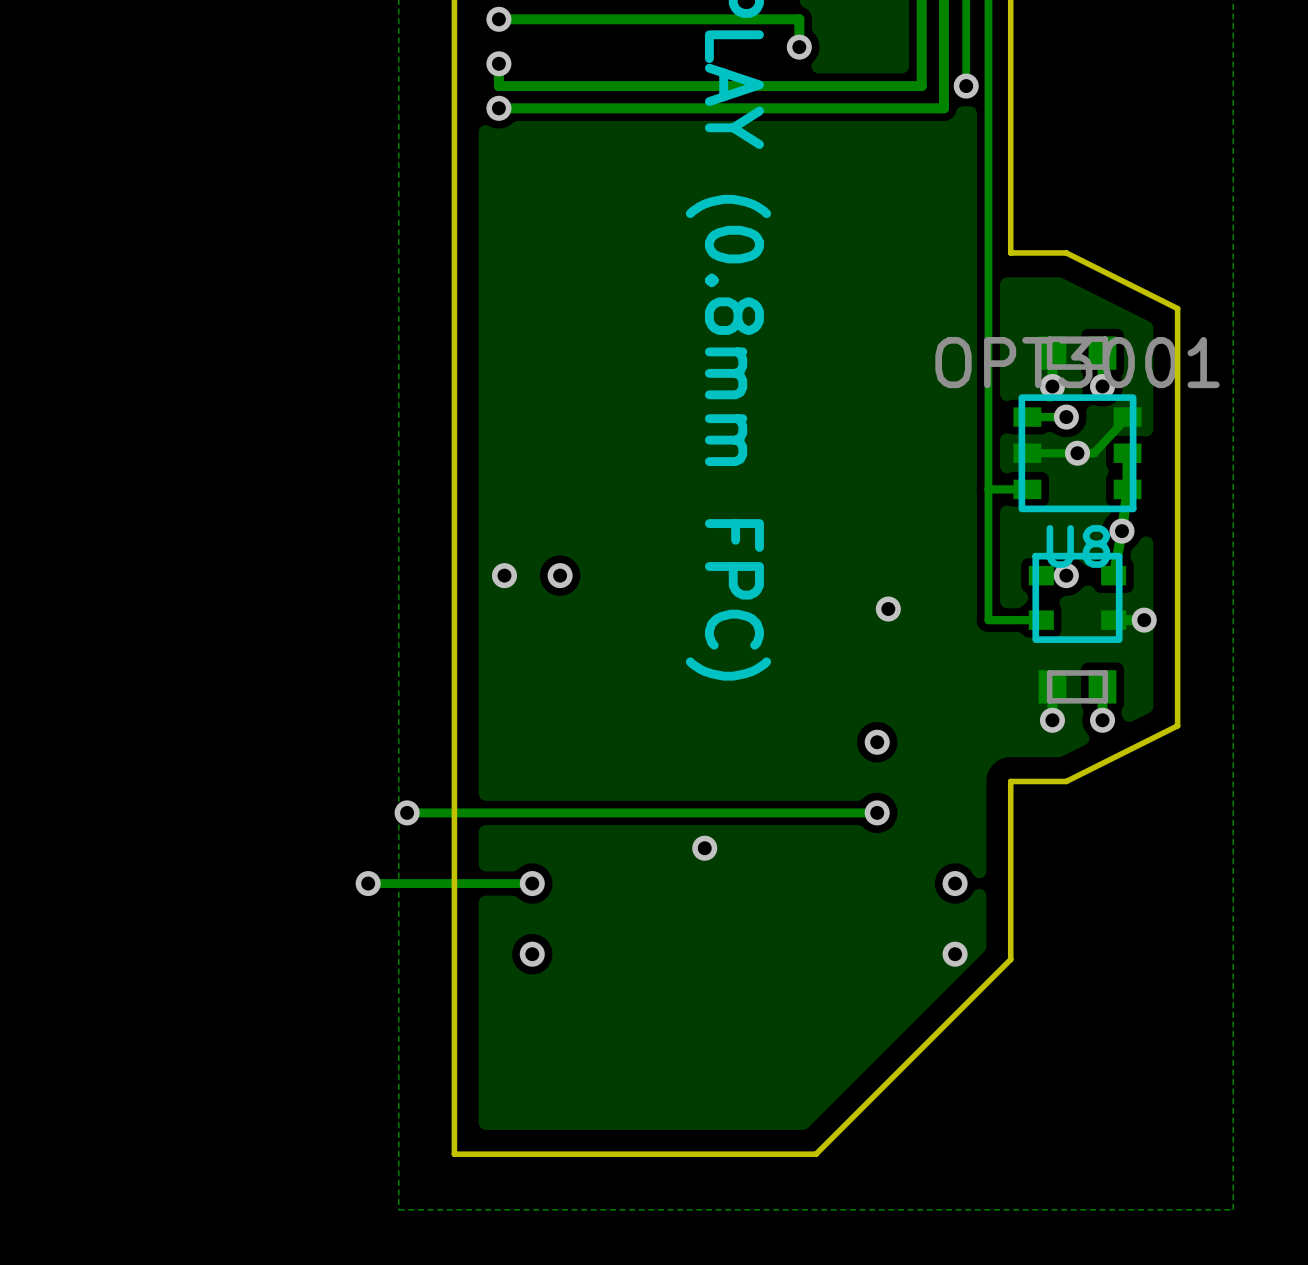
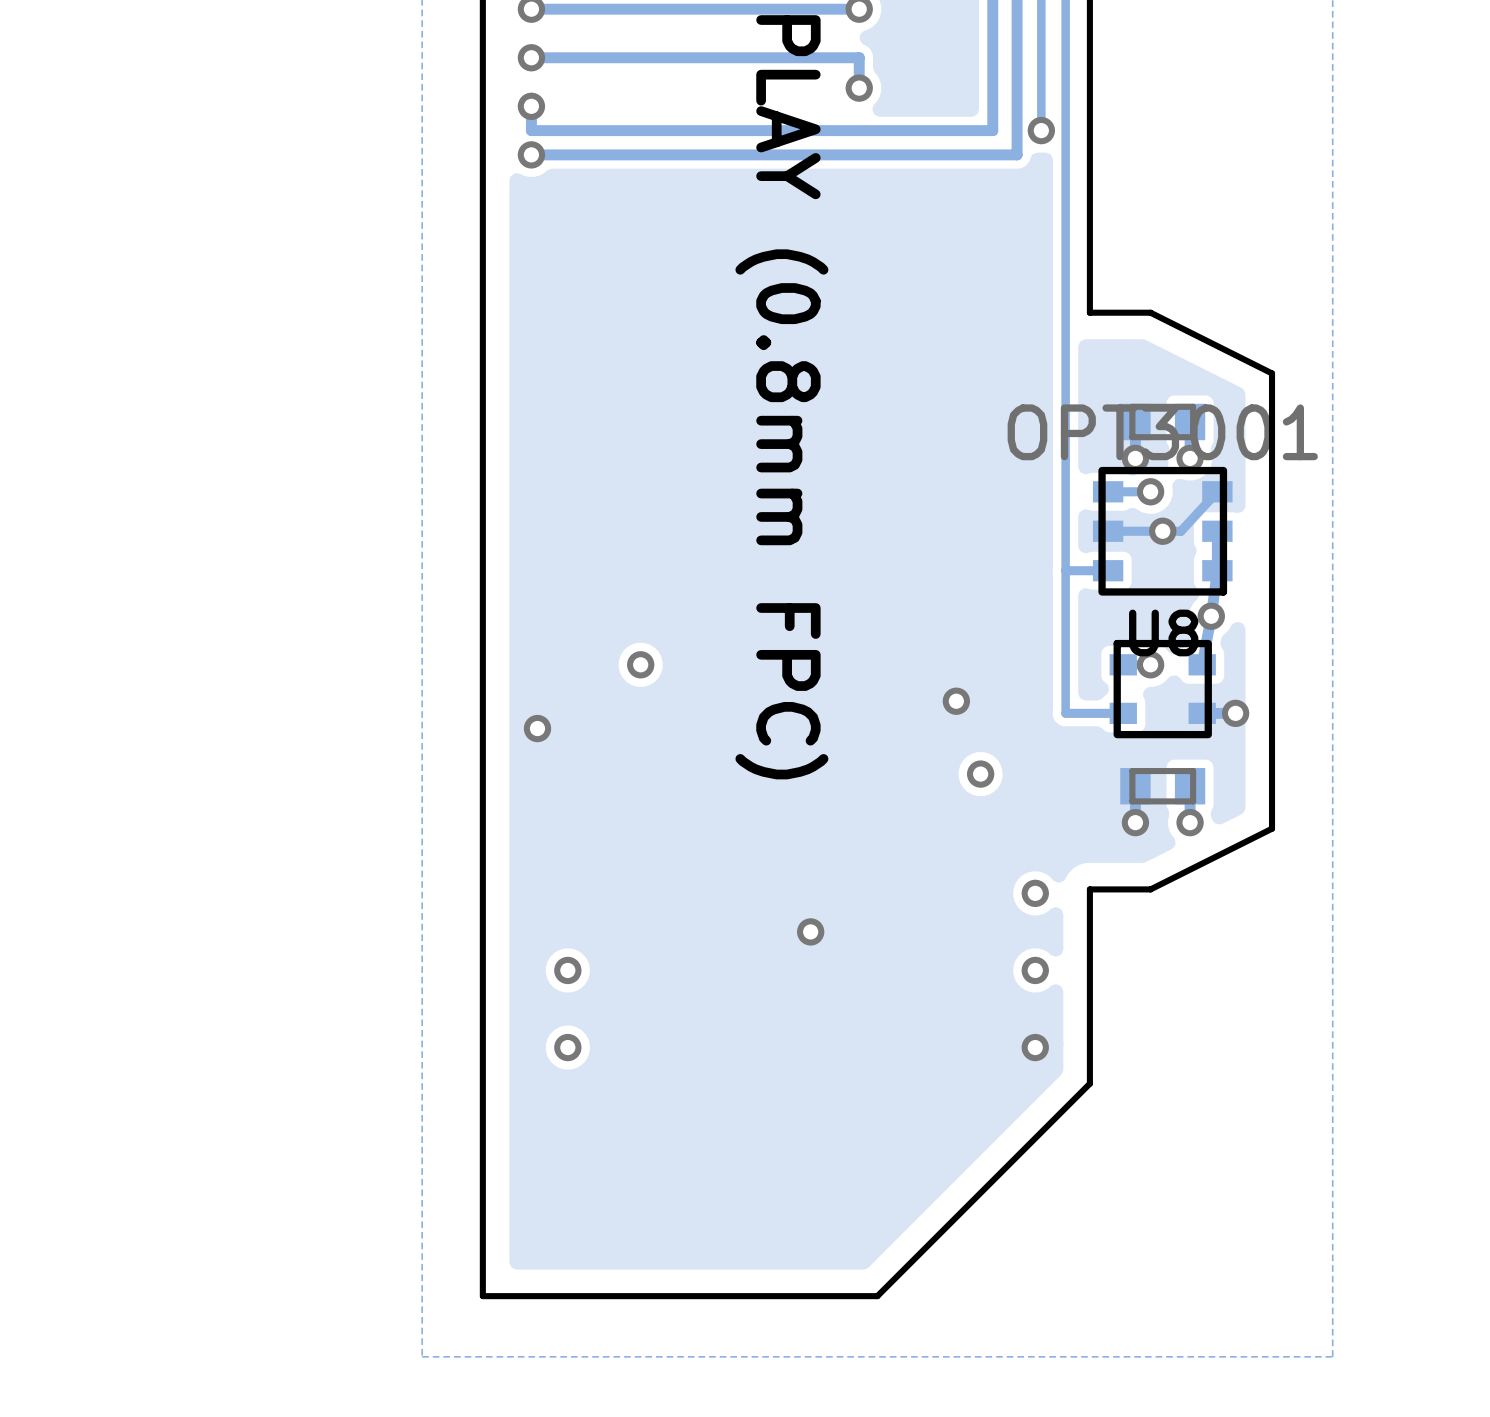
via: (504, 575) -> none
via position: (560, 575) -> (640, 664)
via: none -> (537, 728)
via: none -> (980, 774)
via: (877, 742) -> none
via: none -> (1035, 893)
via: (407, 812) -> none
track: (877, 812) (407, 812) -> none
via: (877, 812) -> none
via position: (704, 848) -> (810, 931)
via: none -> (567, 970)
via: none -> (1035, 970)
via: (368, 883) -> none
track: (532, 883) (368, 883) -> none
via: (532, 883) -> none
via: (955, 883) -> none
via: none -> (567, 1047)
via: none -> (1035, 1047)
via: (532, 954) -> none
via: (955, 954) -> none

